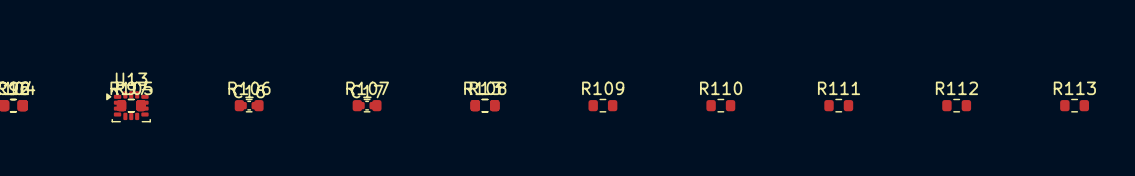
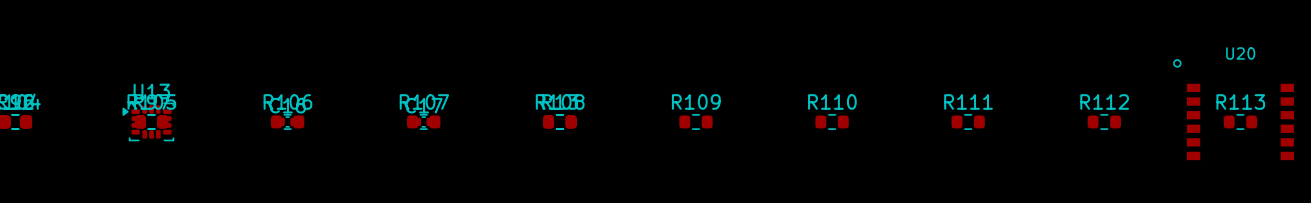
U20: none -> (1233, 109)

